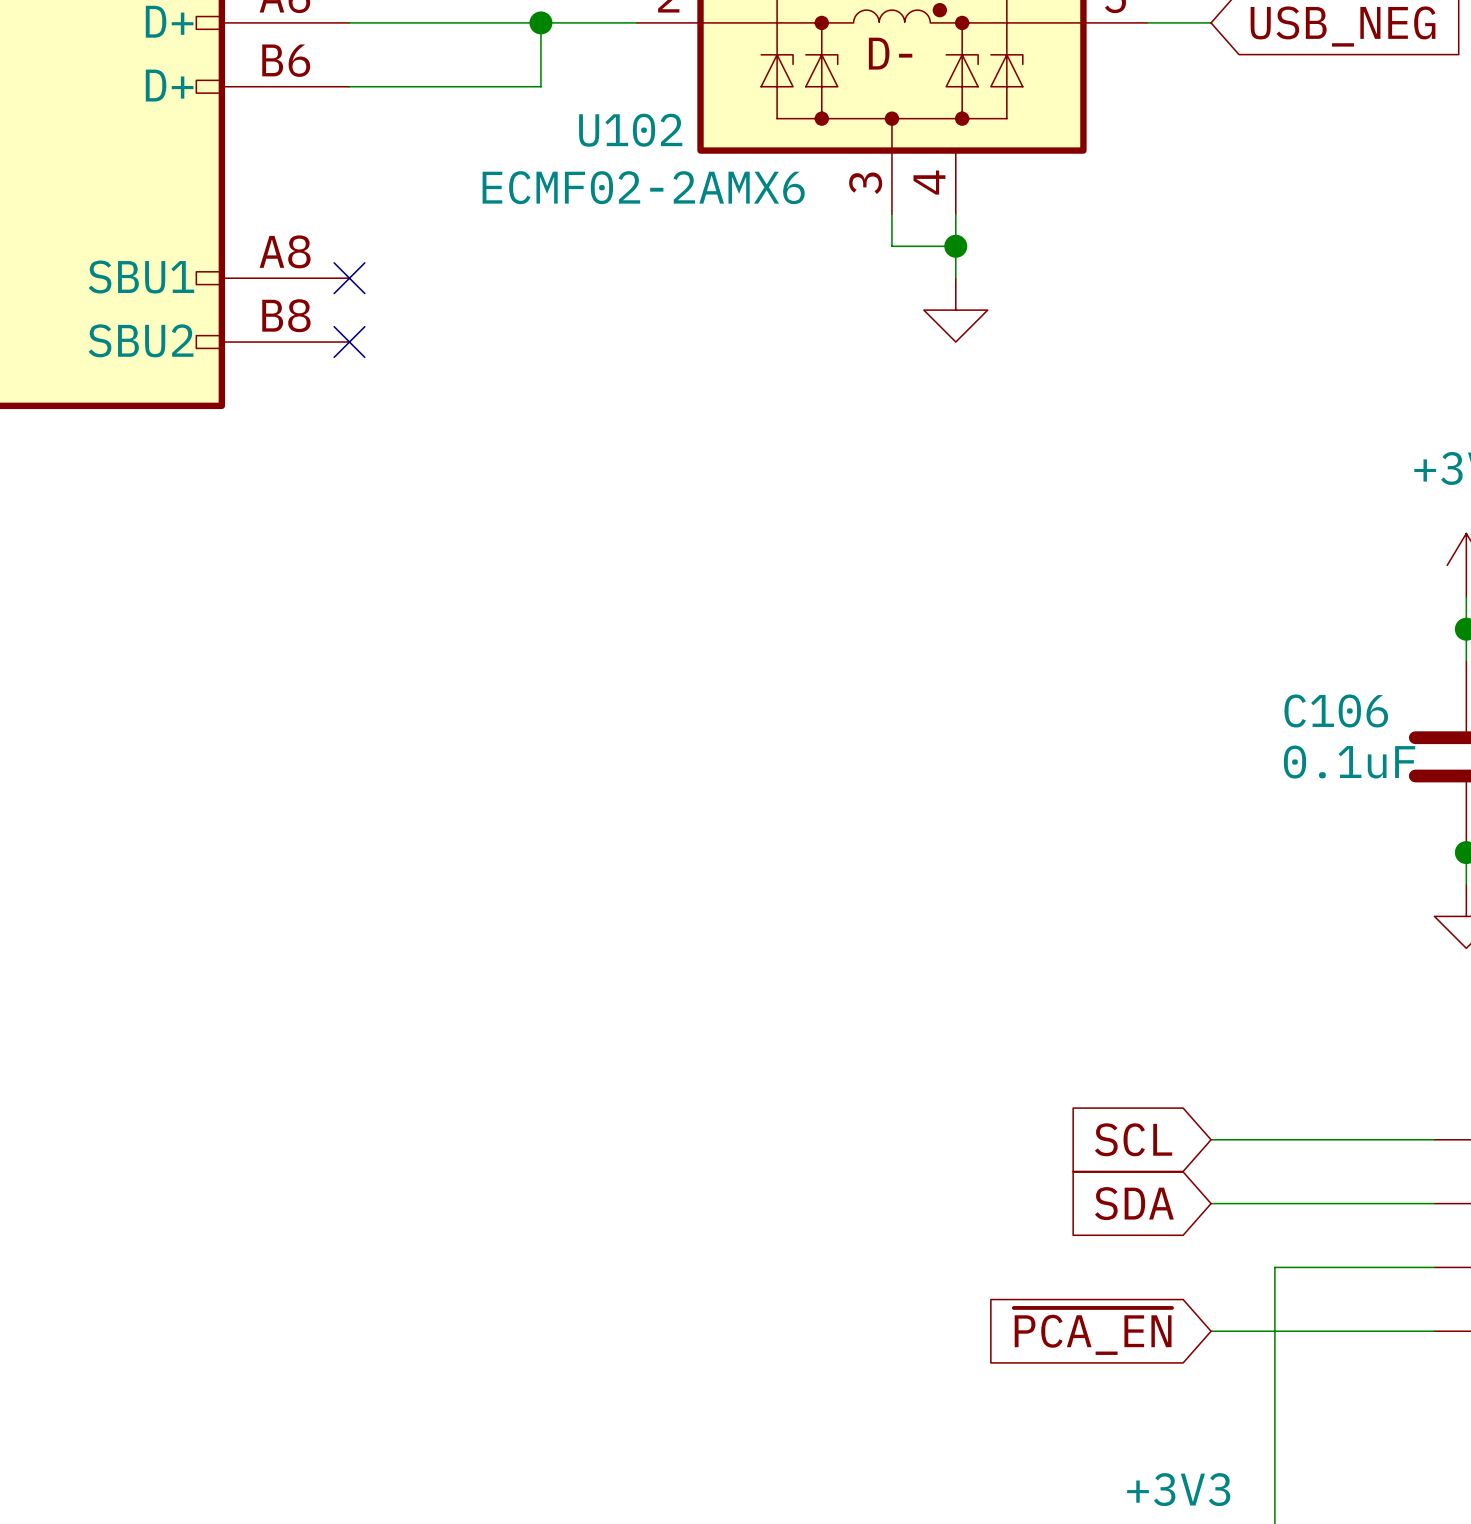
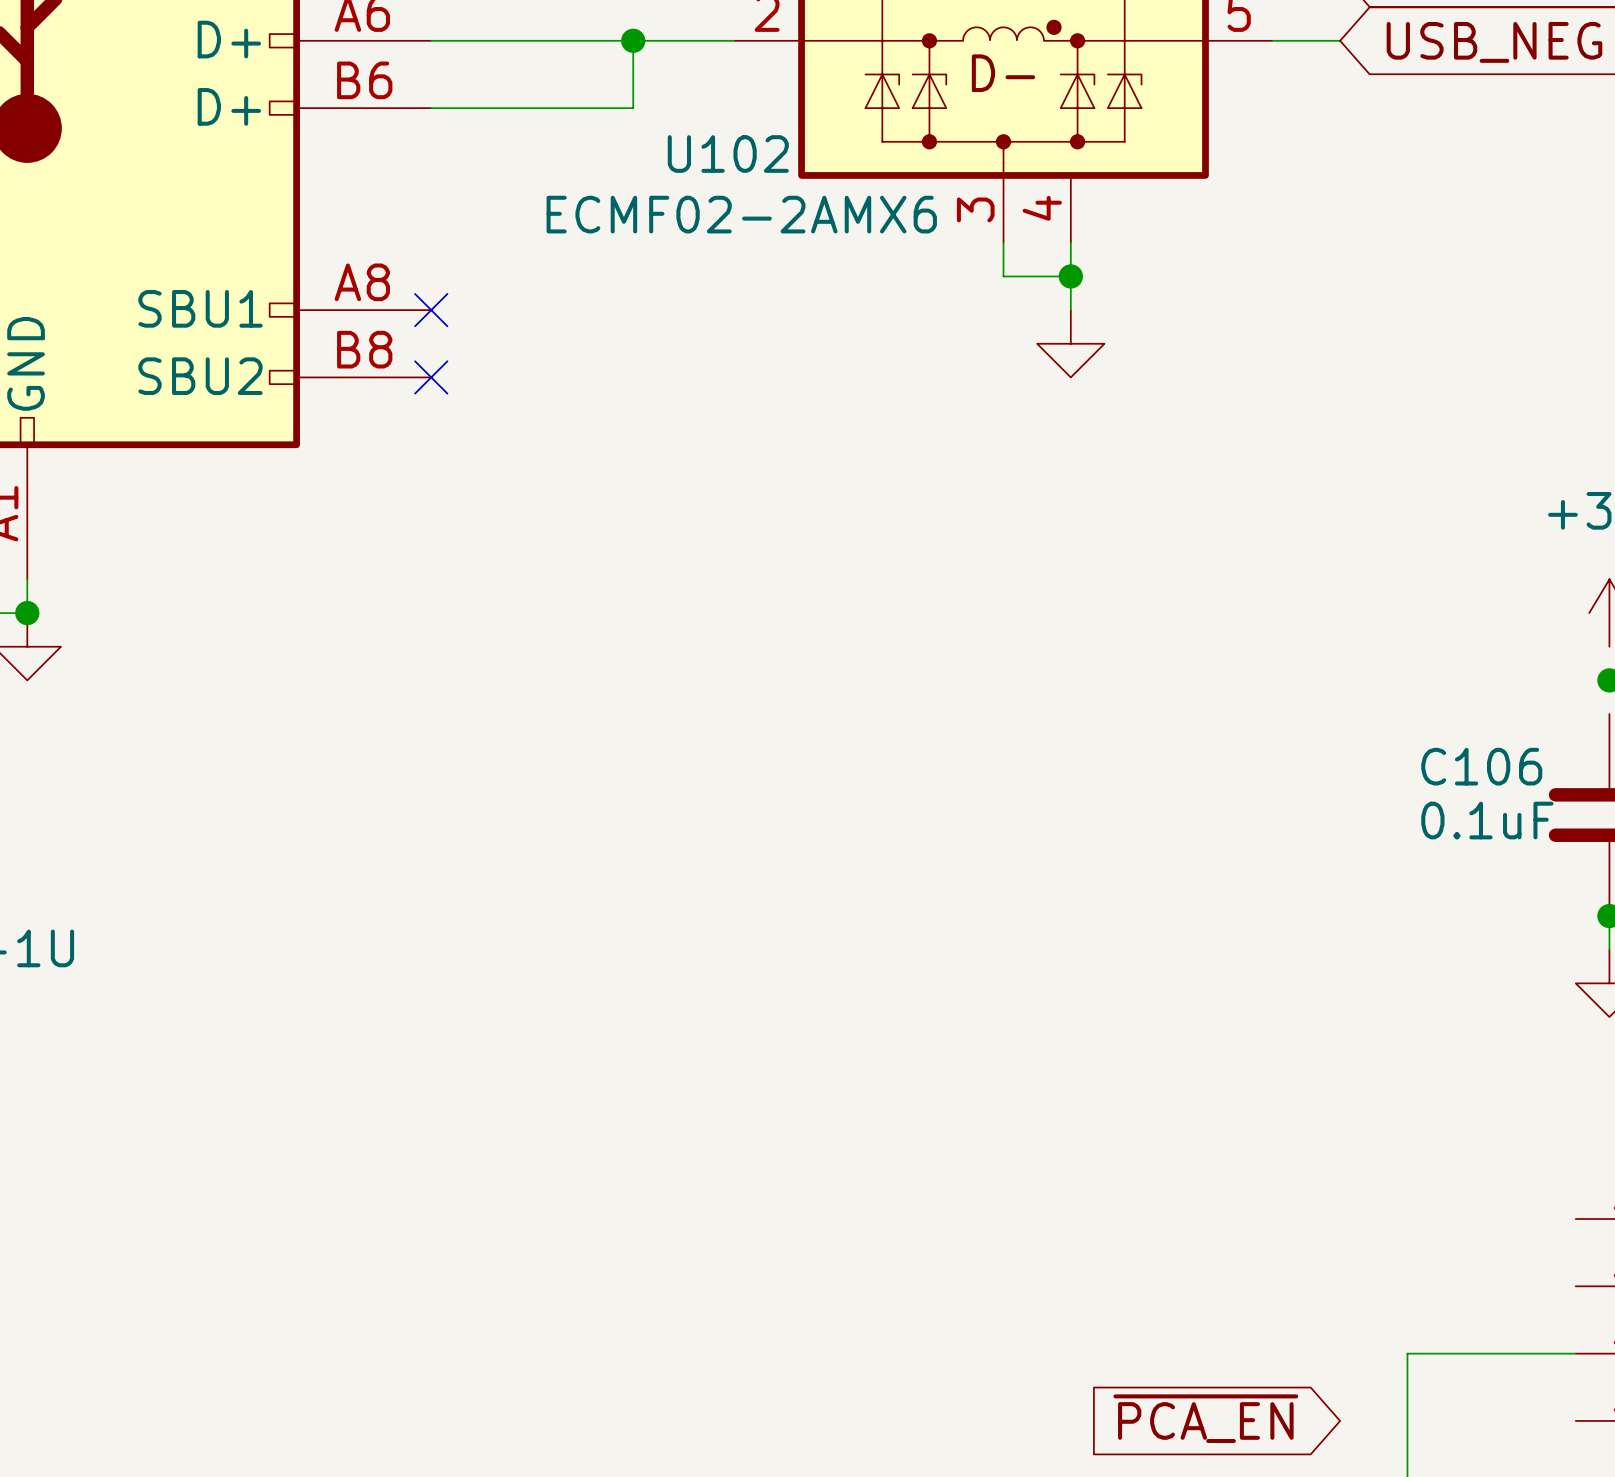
wire: (1466, 597) (1466, 661) -> none
global label: SCL (1133, 1139) -> none
wire: (1211, 1139) (1434, 1139) -> none
global label: SDA (1134, 1203) -> none
wire: (1211, 1203) (1434, 1203) -> none
wire: (1211, 1331) (1434, 1331) -> none

